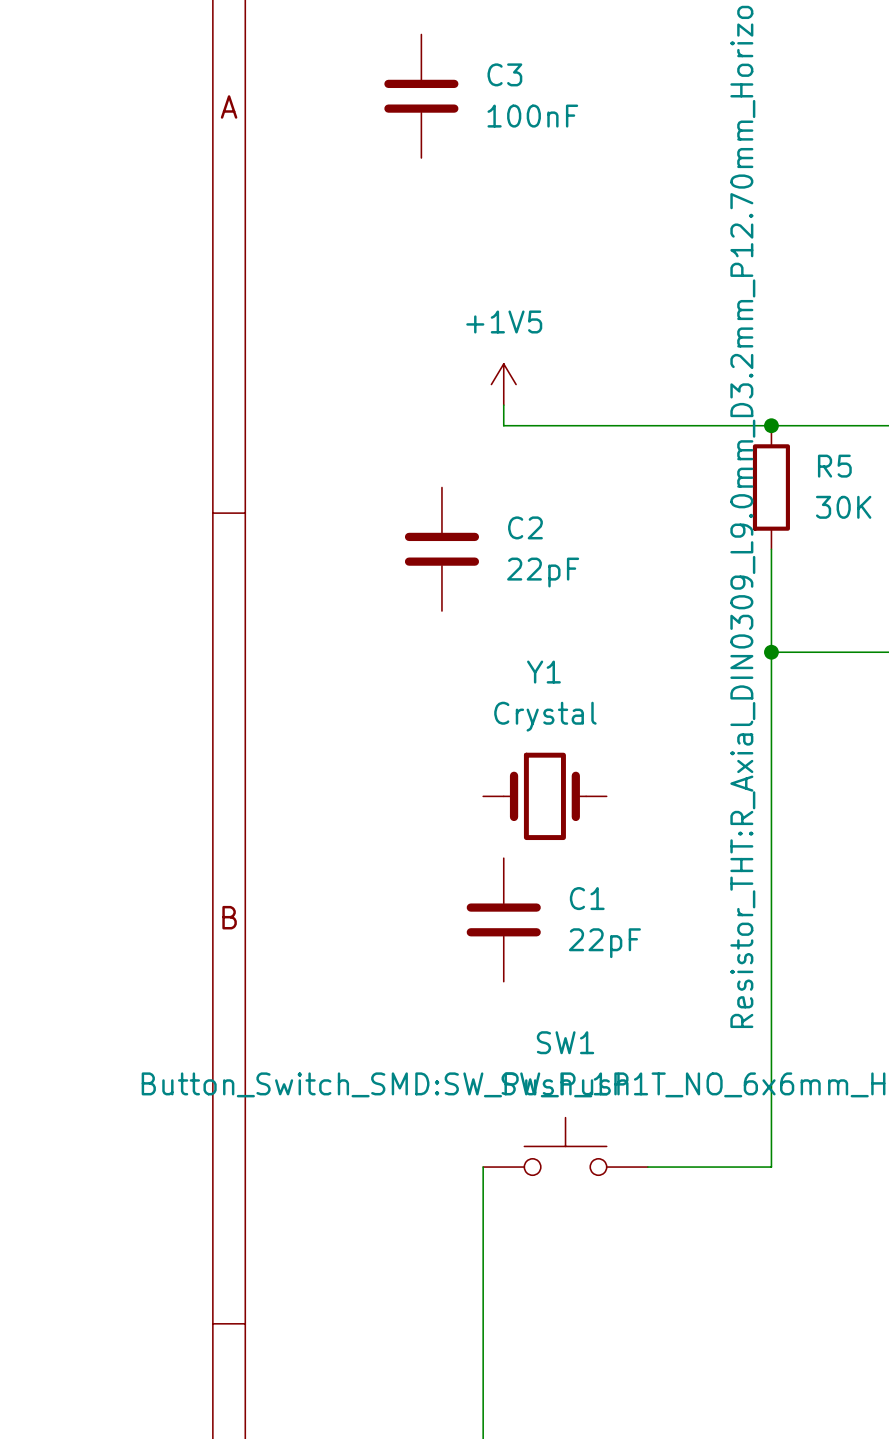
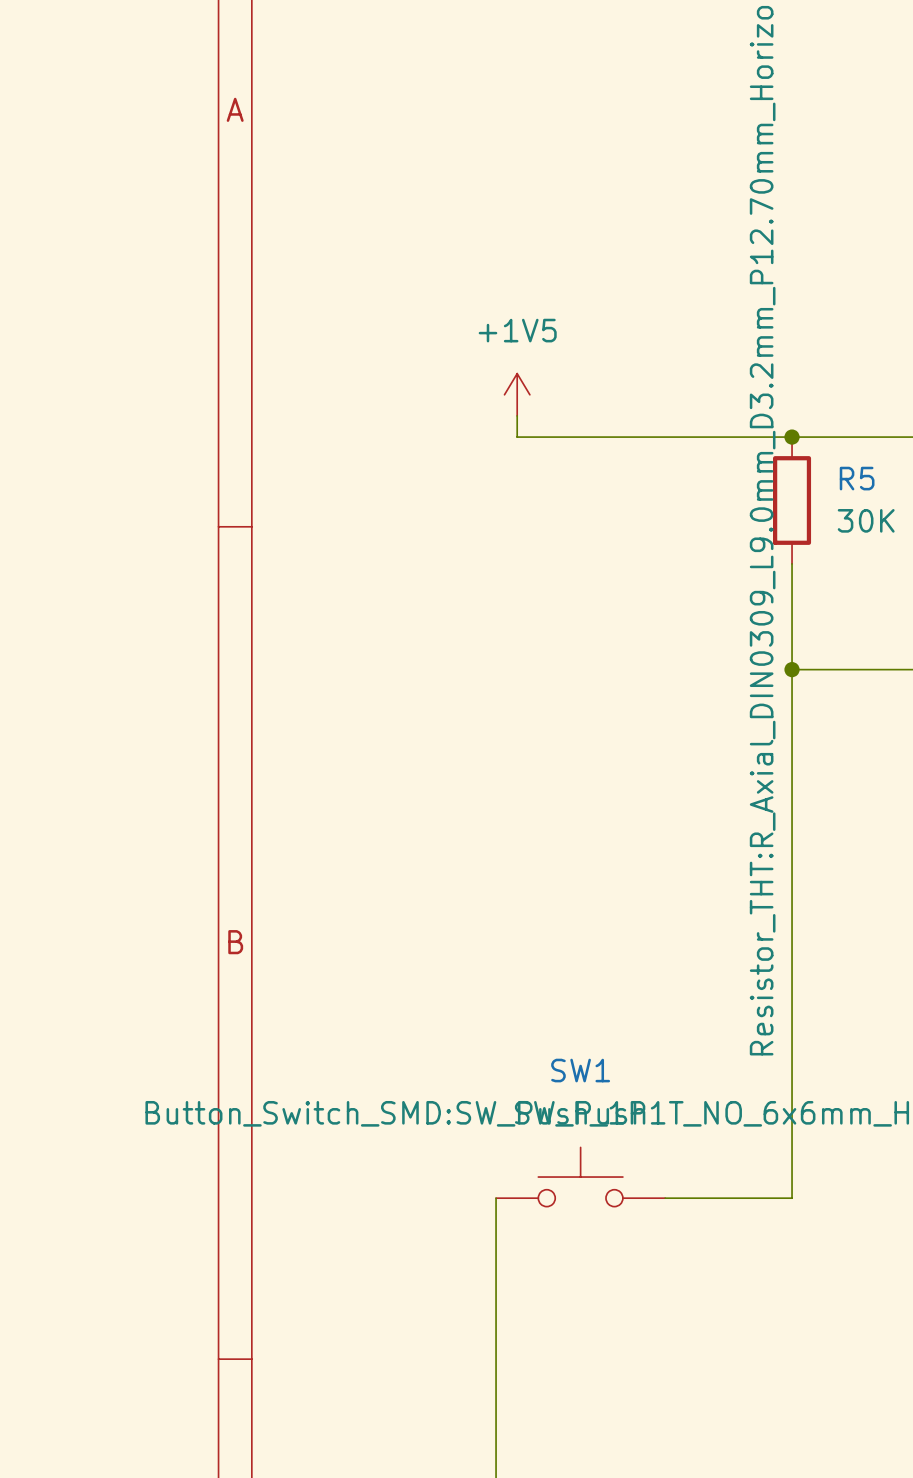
C3: 100nF (421, 96) -> none
C2: 22pF (441, 549) -> none
Y1: Crystal (544, 796) -> none
C1: 22pF (503, 919) -> none

